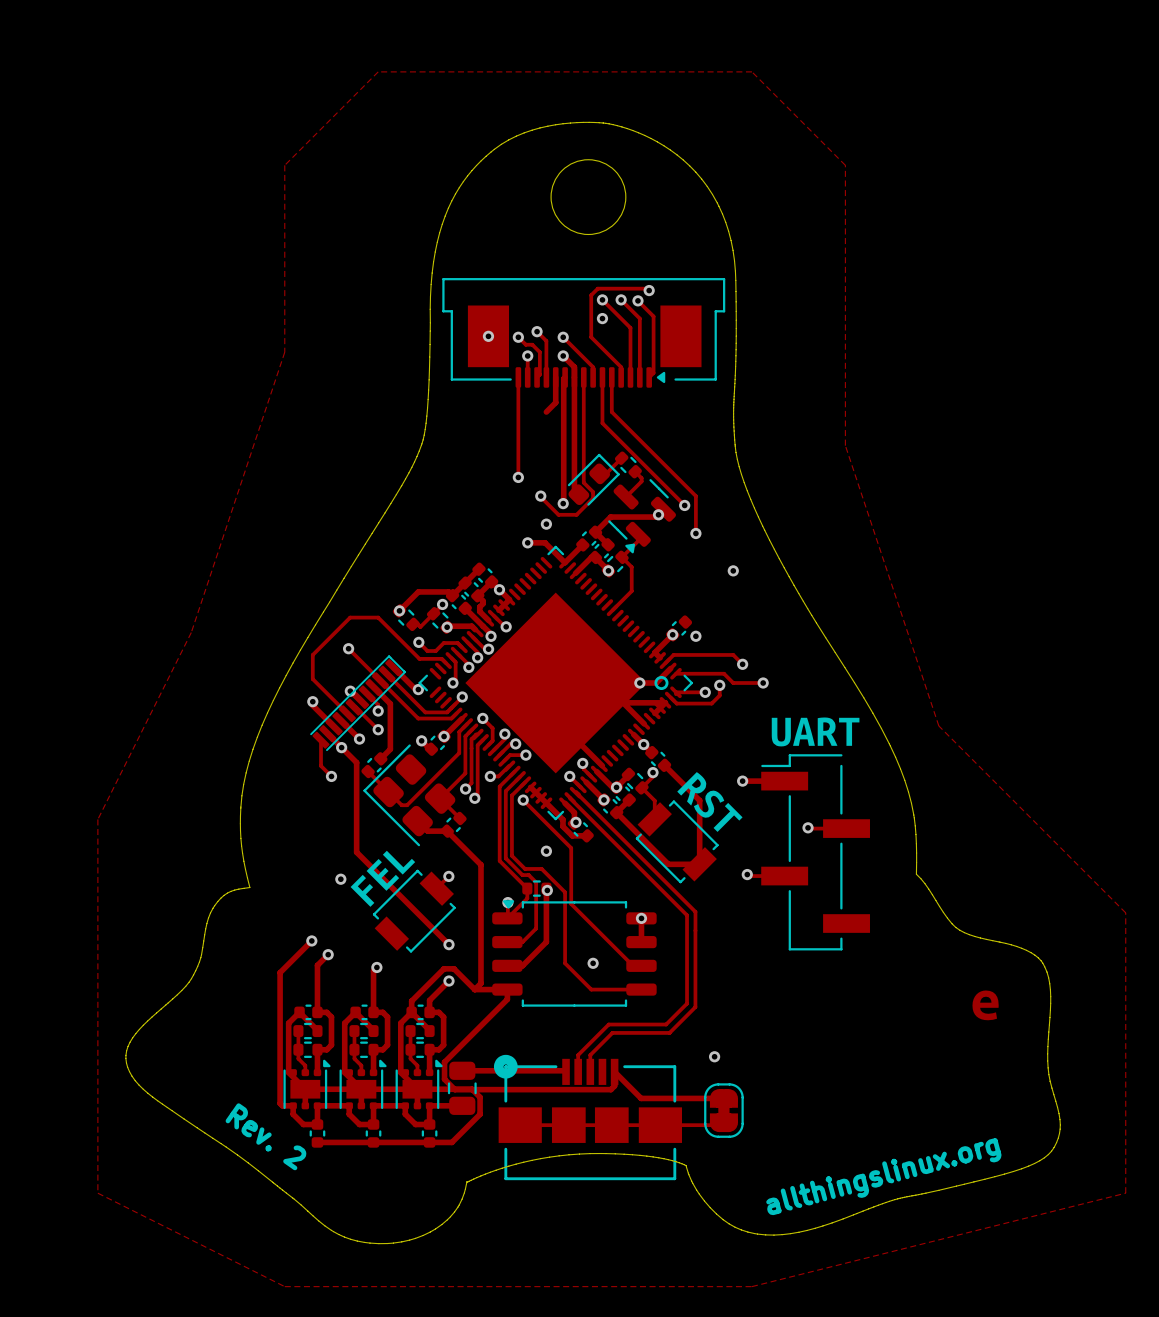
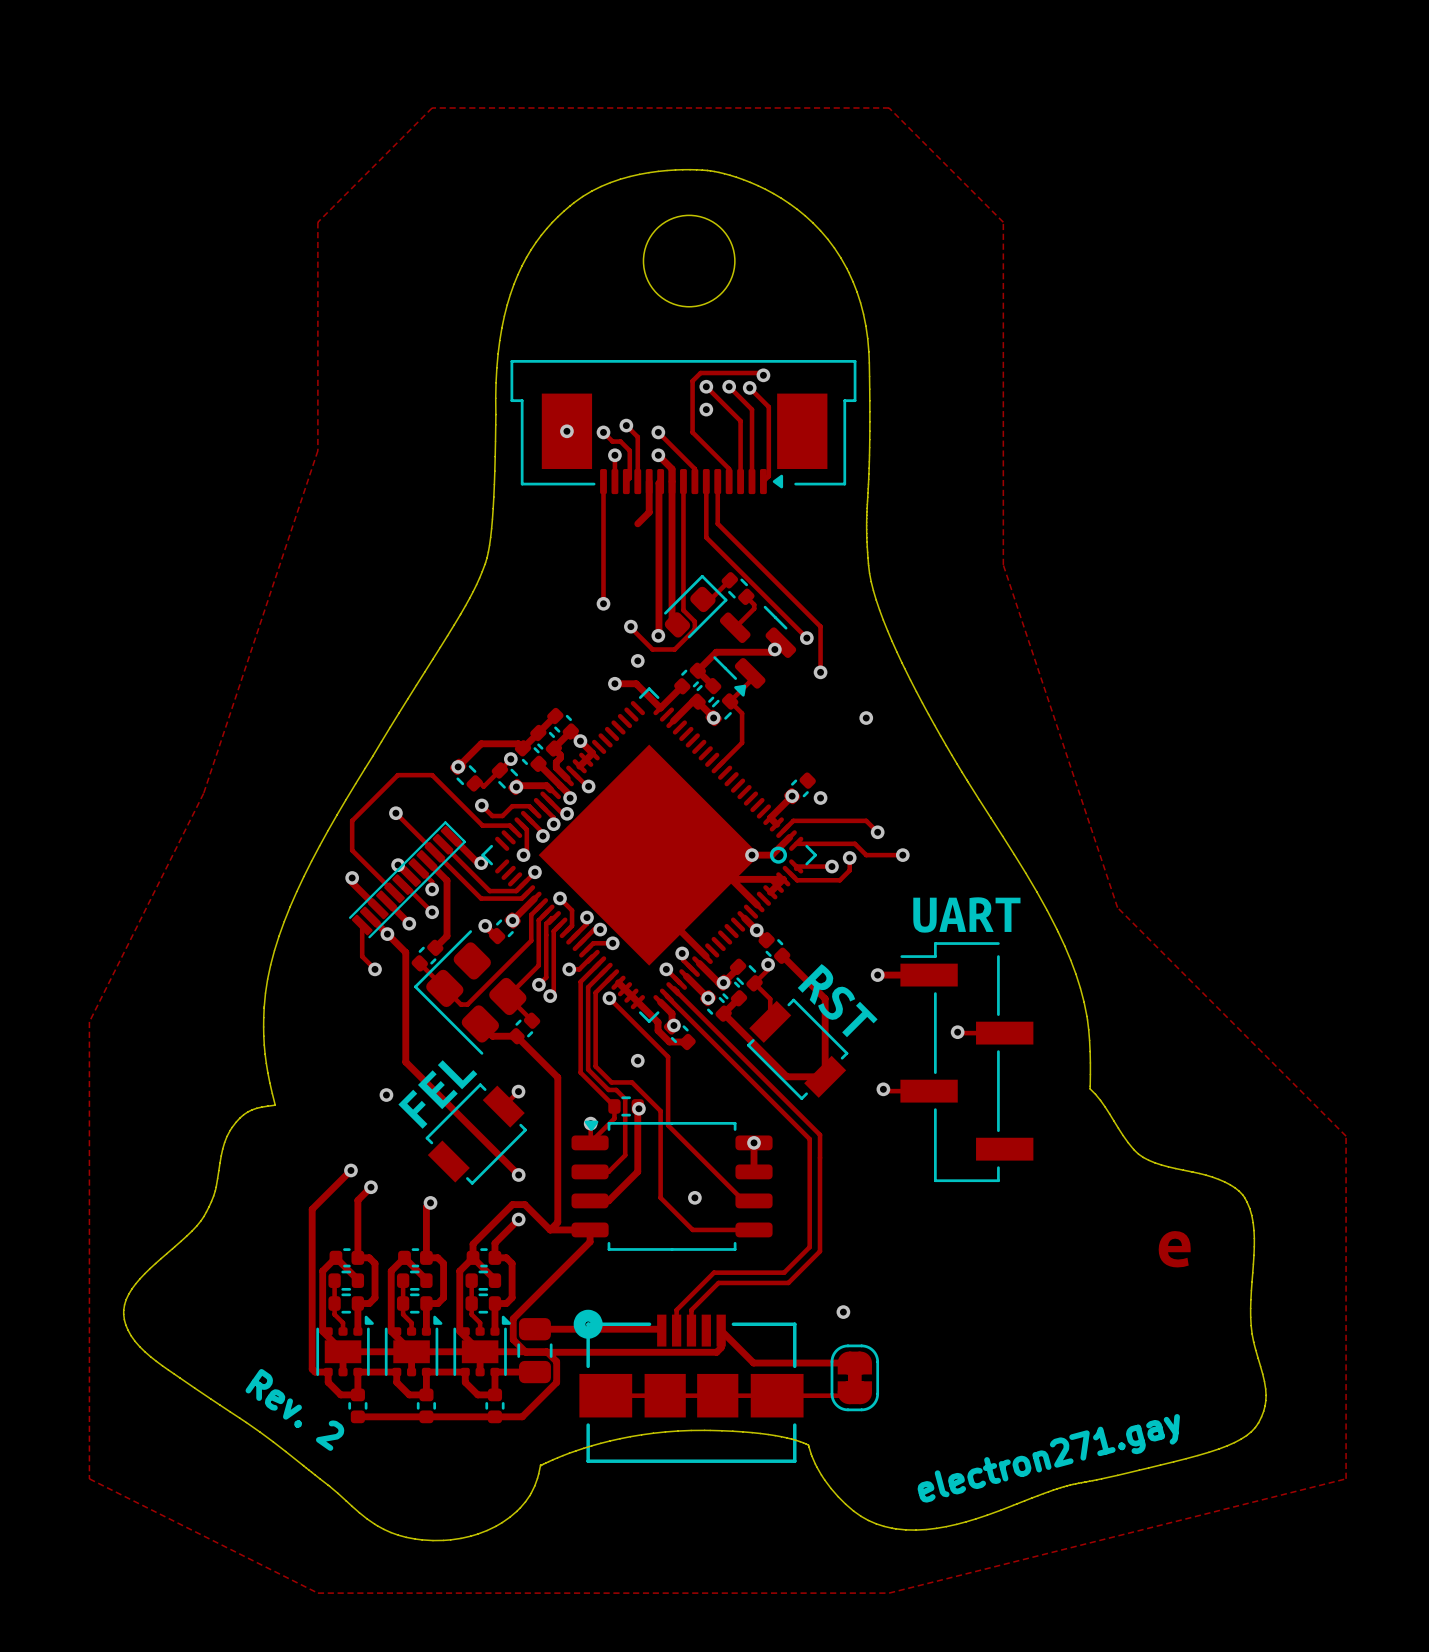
text: allthingslinux.org (883, 1176) -> electron271.gay (1048, 1458)

